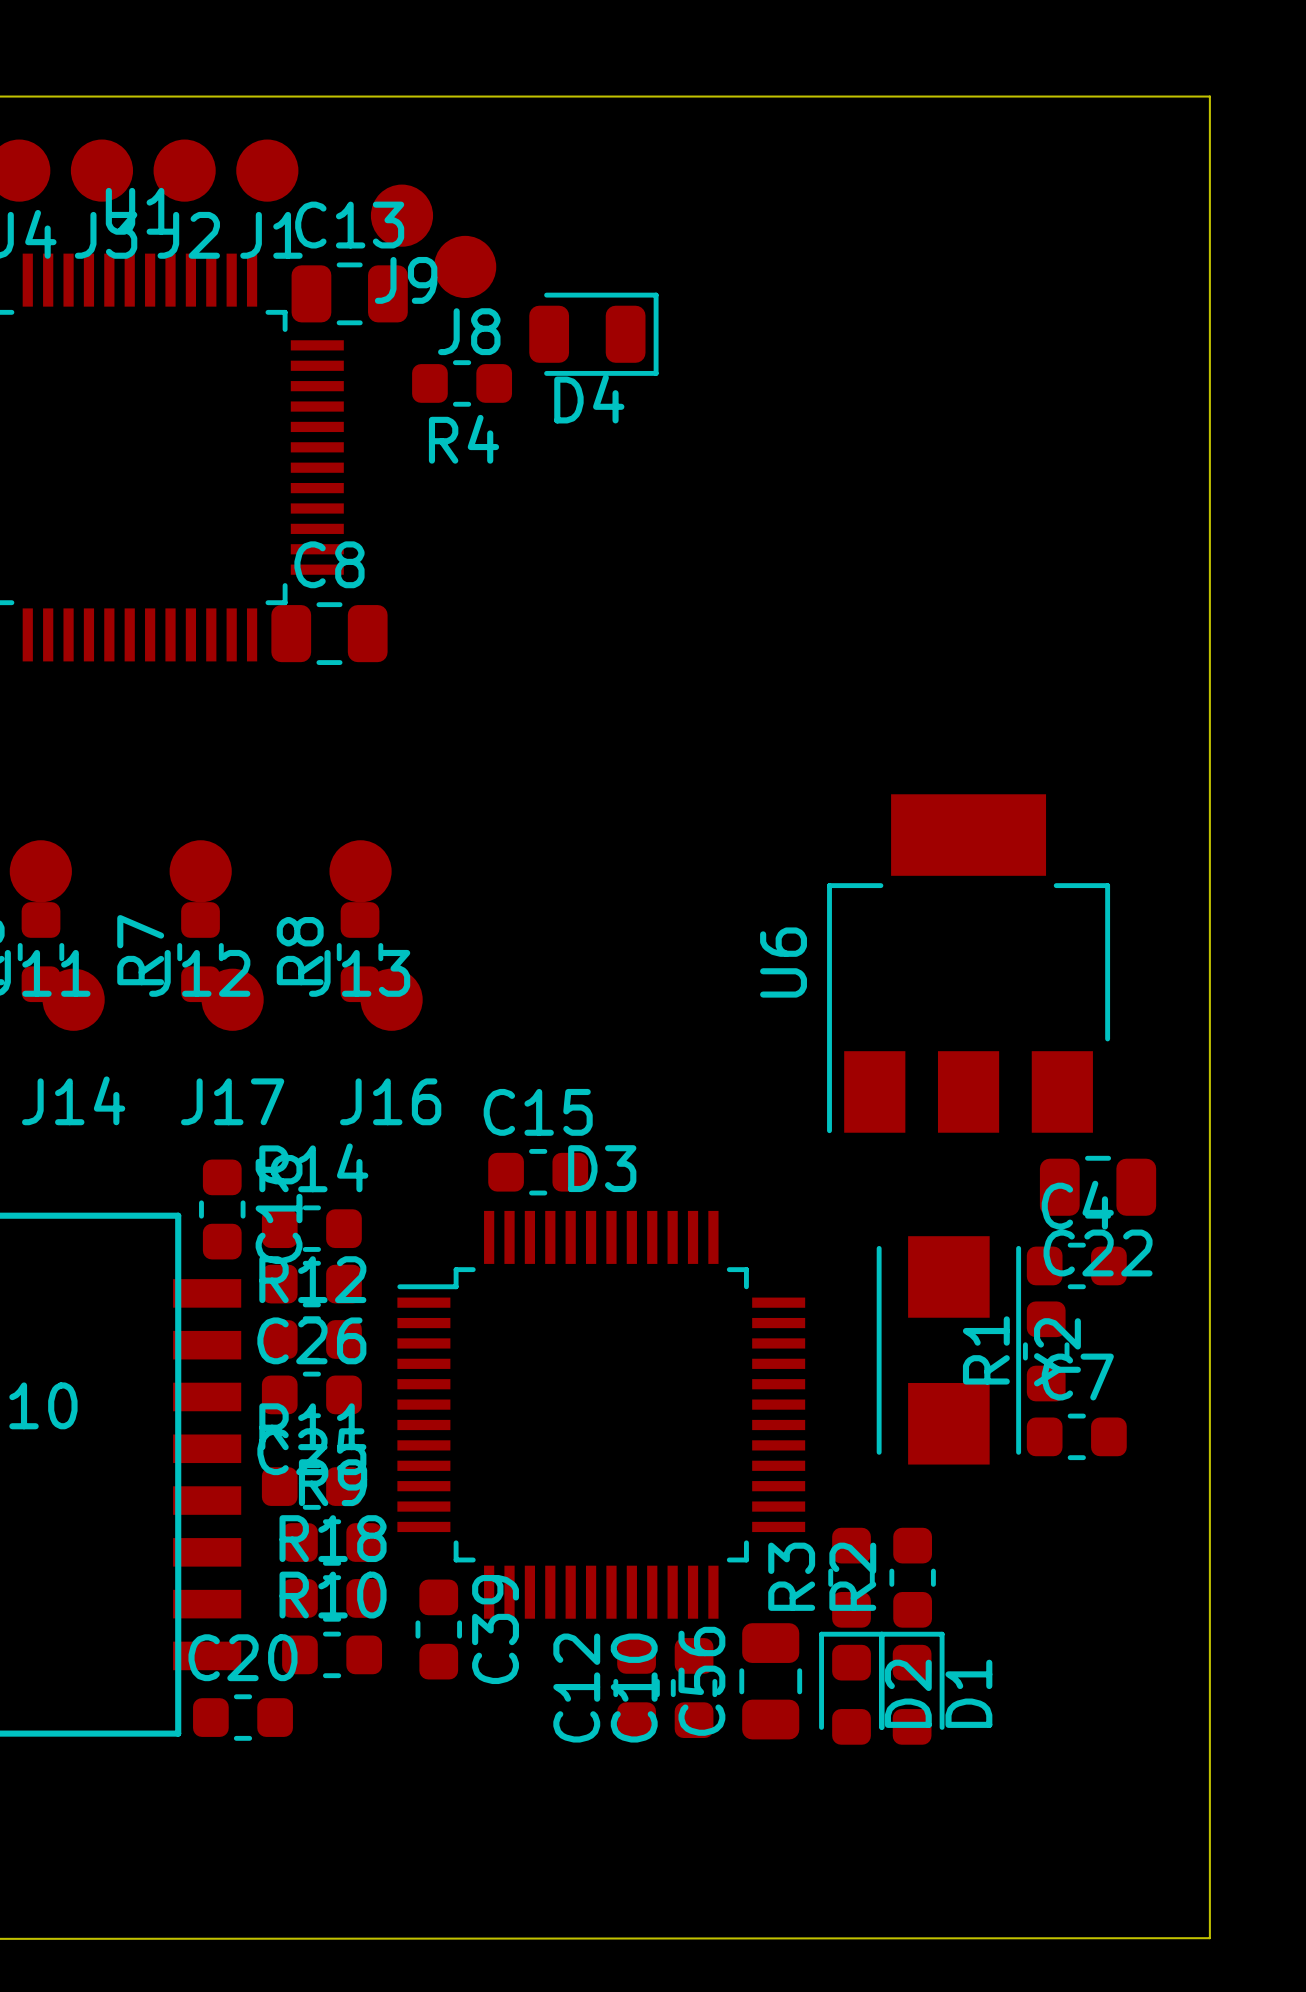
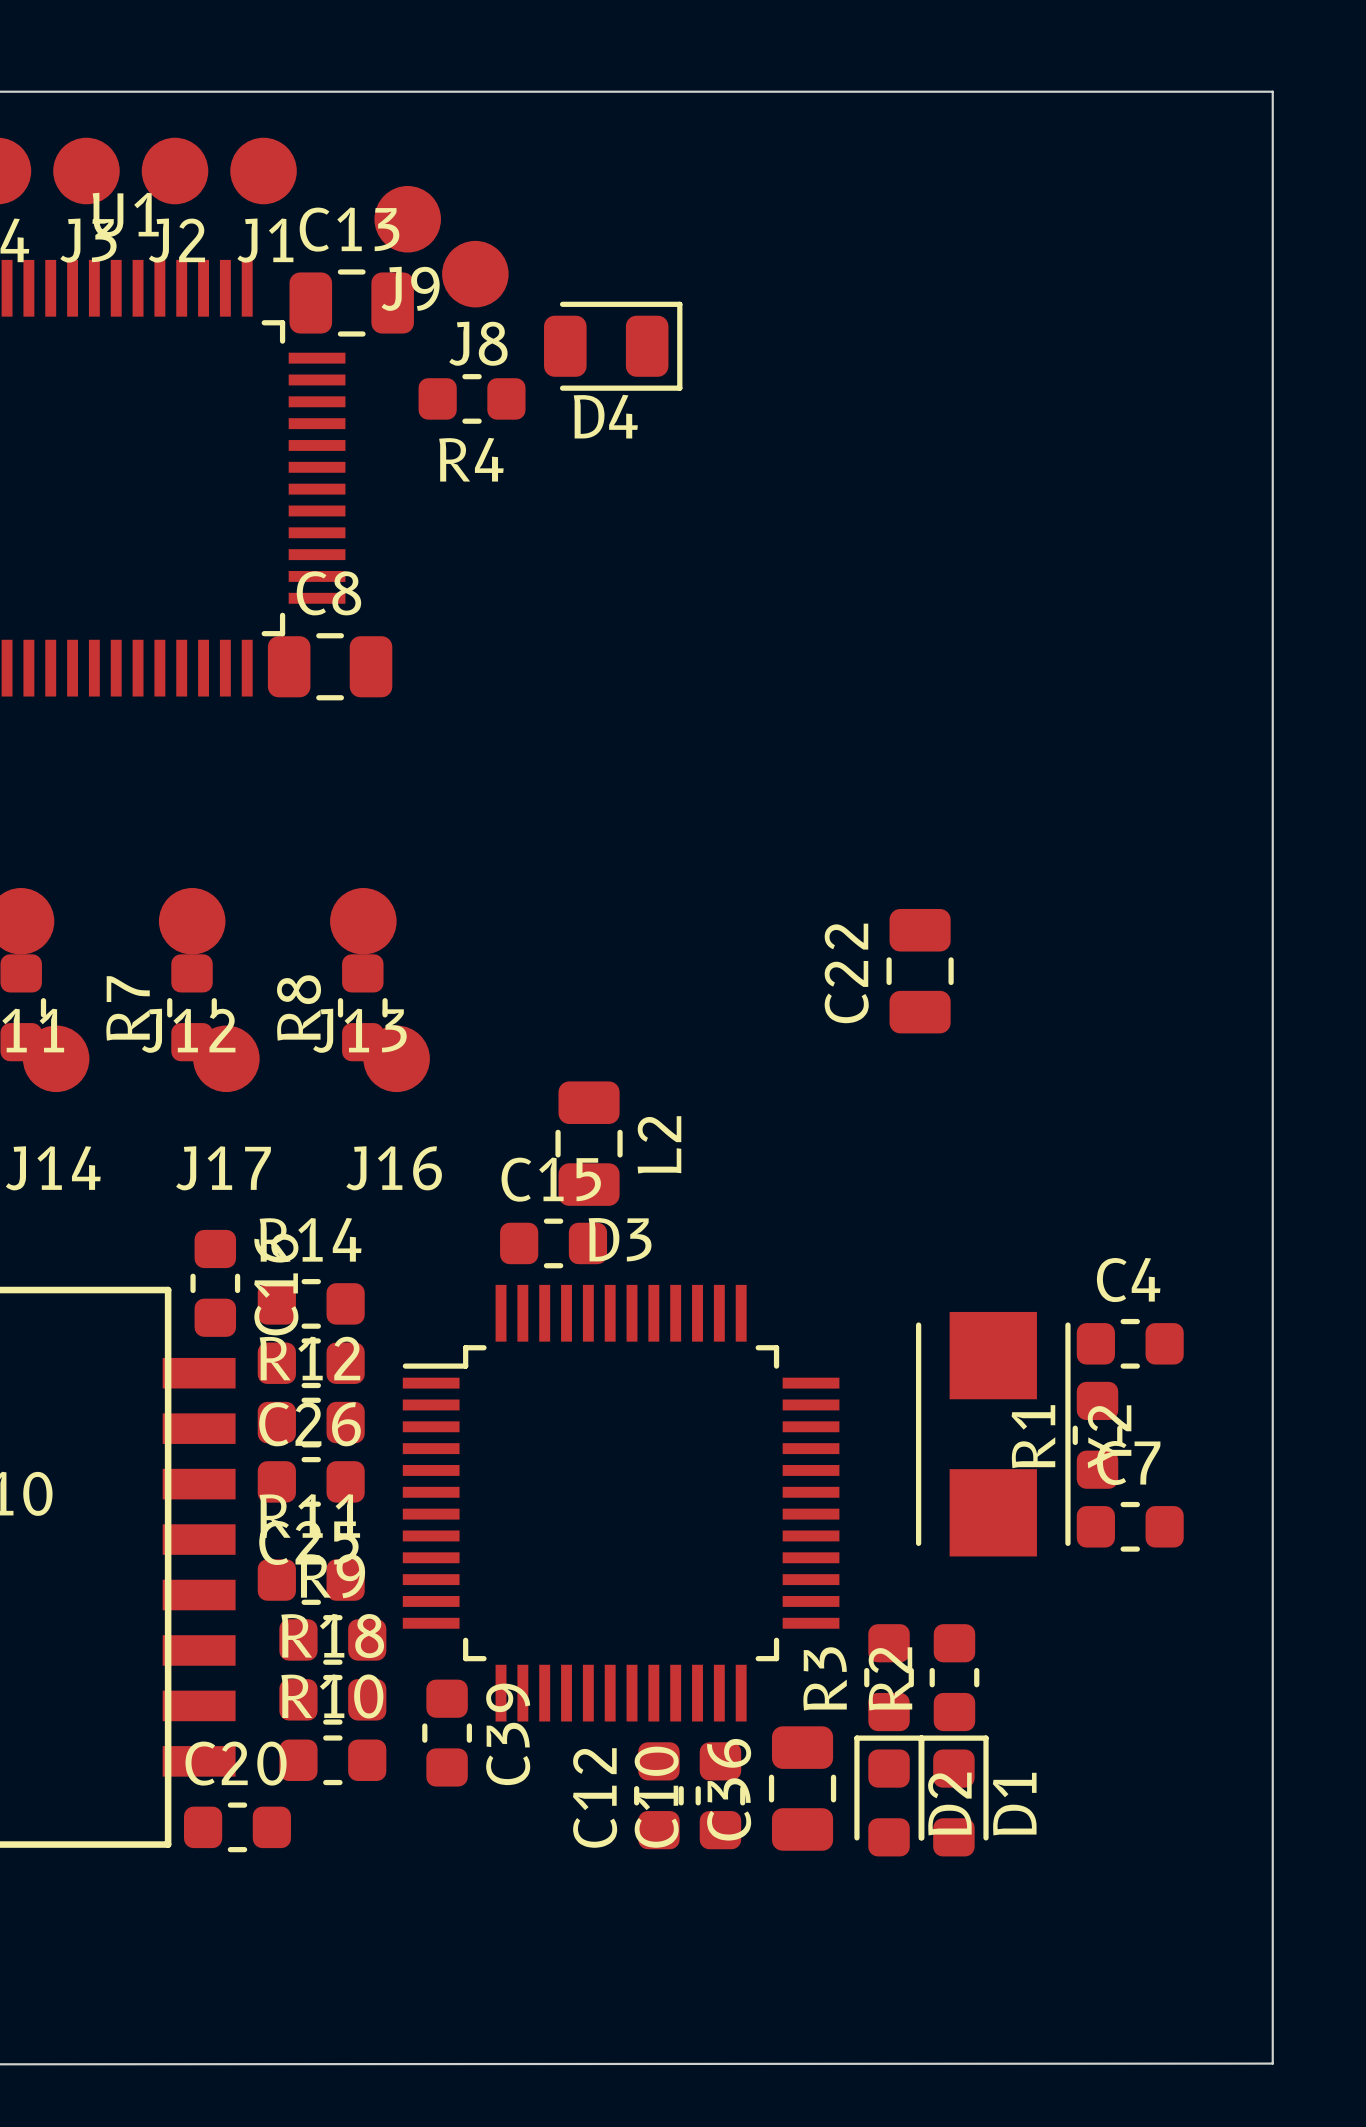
U6: (968, 963) -> none
L2: none -> (589, 1143)
C22 rotation: 0° (1098, 1187) -> 90° clockwise (920, 971)
C22 position: (1098, 1187) -> (920, 971)
C56 name: C56 (701, 1681) -> C36 (729, 1789)

